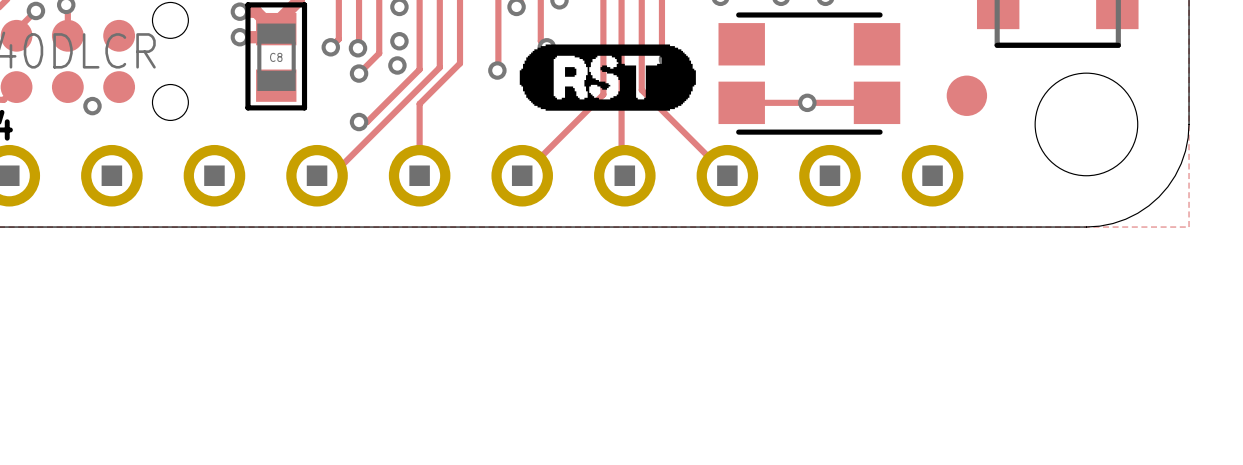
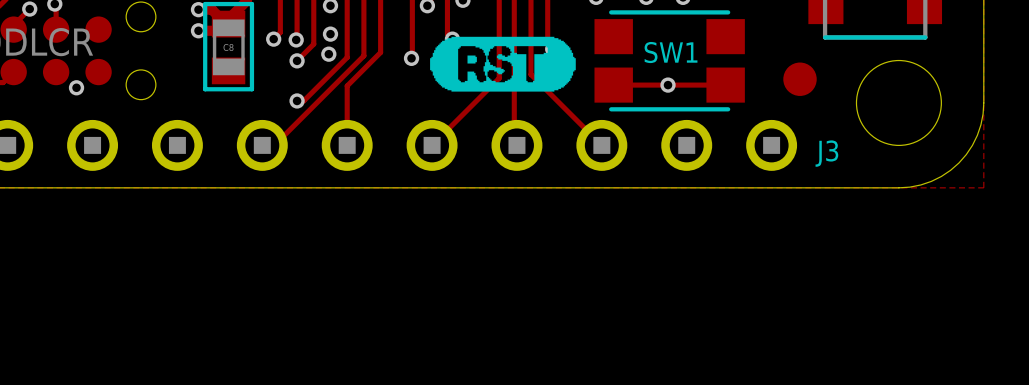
SW1 name: none -> SW1 (671, 52)
J3 name: none -> J3 (826, 153)

